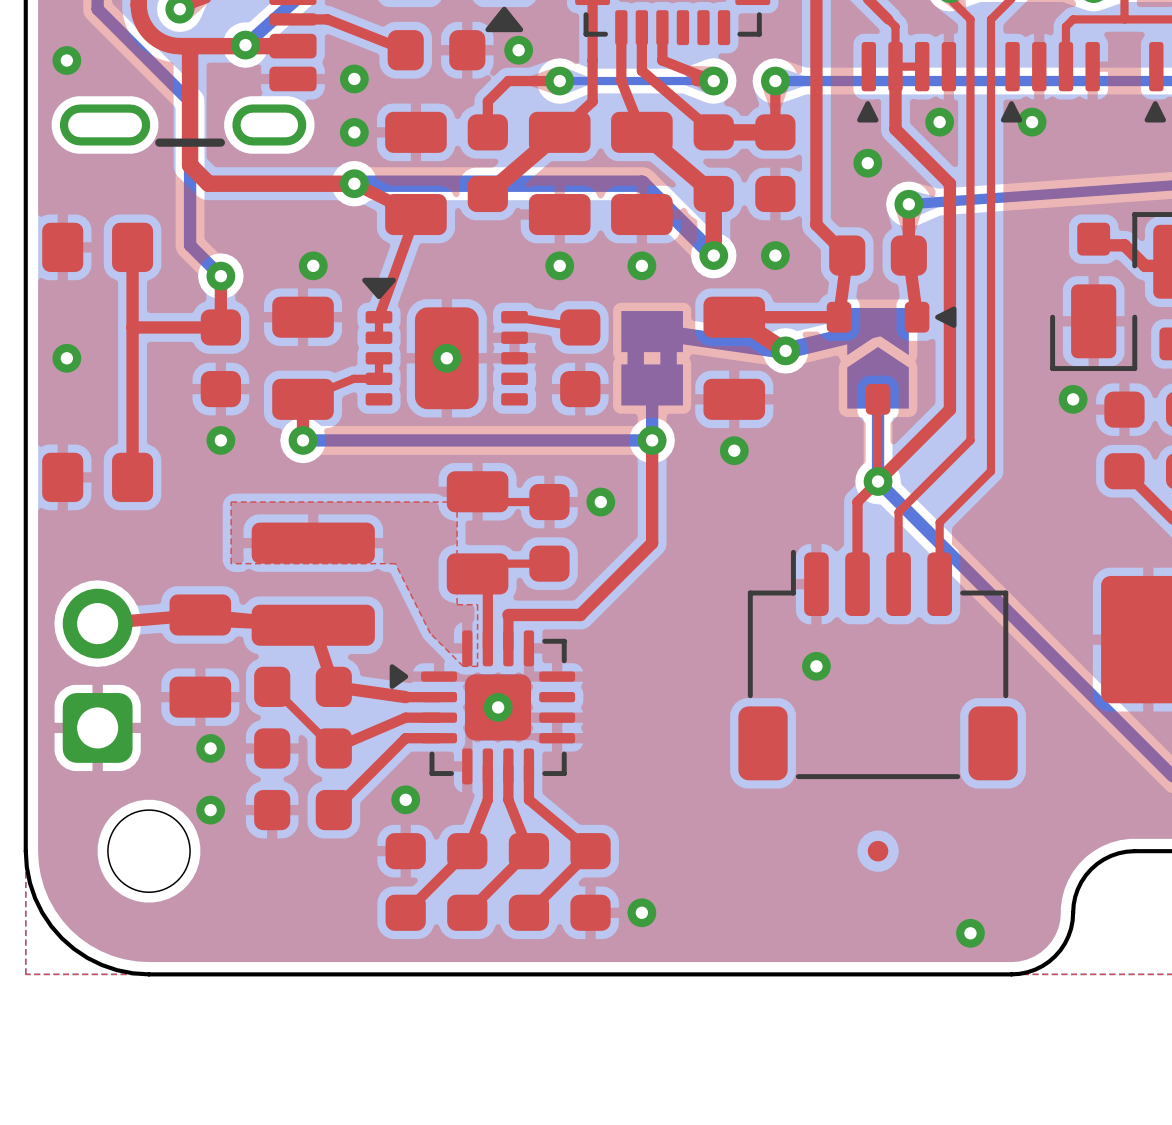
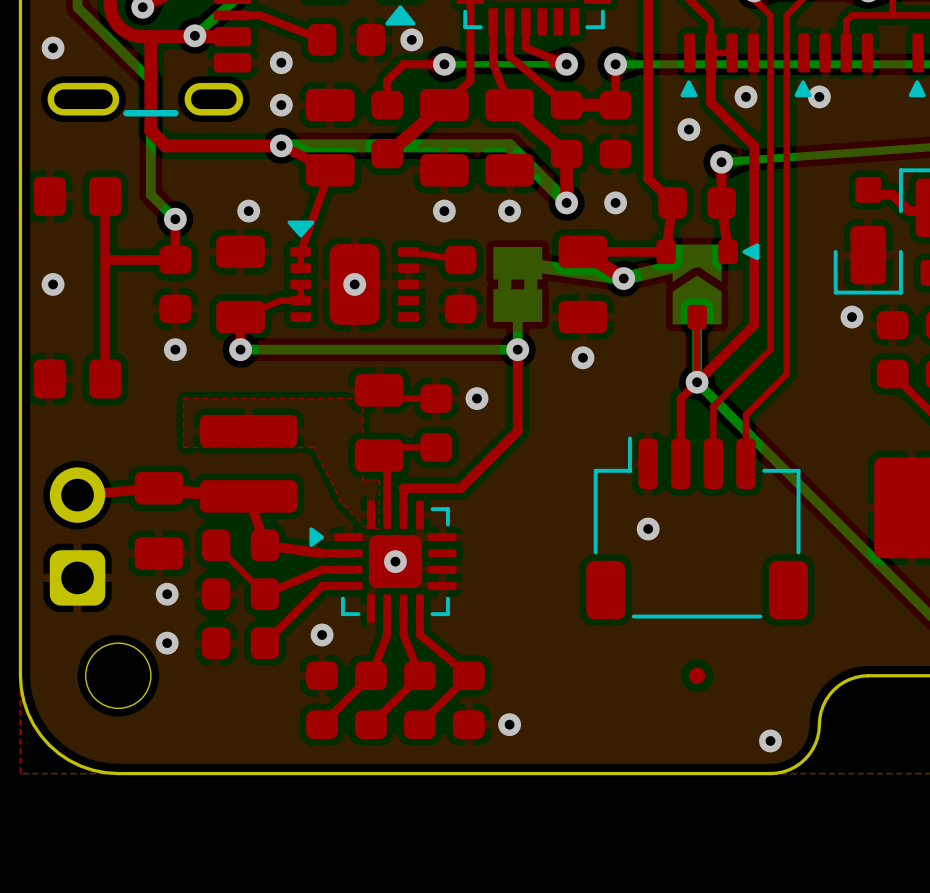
board edge: (1134, 851) (1118, 853) (1103, 859) (1085, 875) (1075, 896) (1068, 936) (1060, 950) (1049, 961) (1035, 969) (1019, 973) (970, 974) -> (900, 675) (861, 676) (849, 679) (838, 685) (829, 694) (823, 705) (817, 737) (809, 754) (794, 767) (783, 771) (770, 773)

